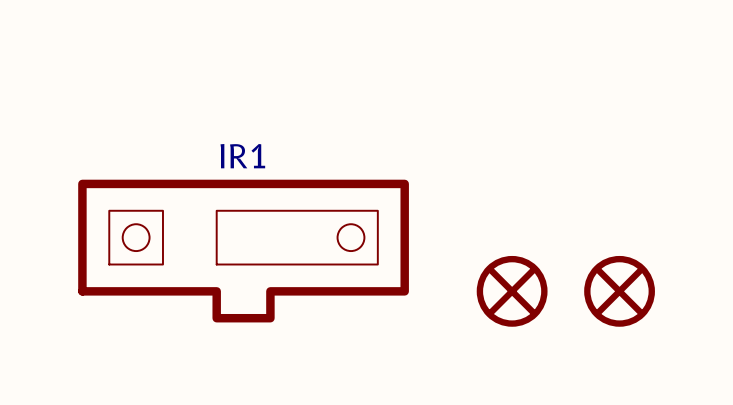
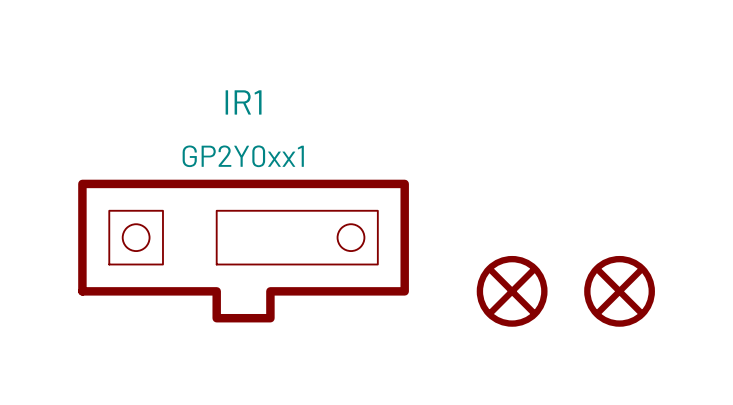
IR1 name position: IR1 (242, 156) -> IR1 (243, 102)
IR1 value: none -> GP2Y0xx1 (243, 156)

